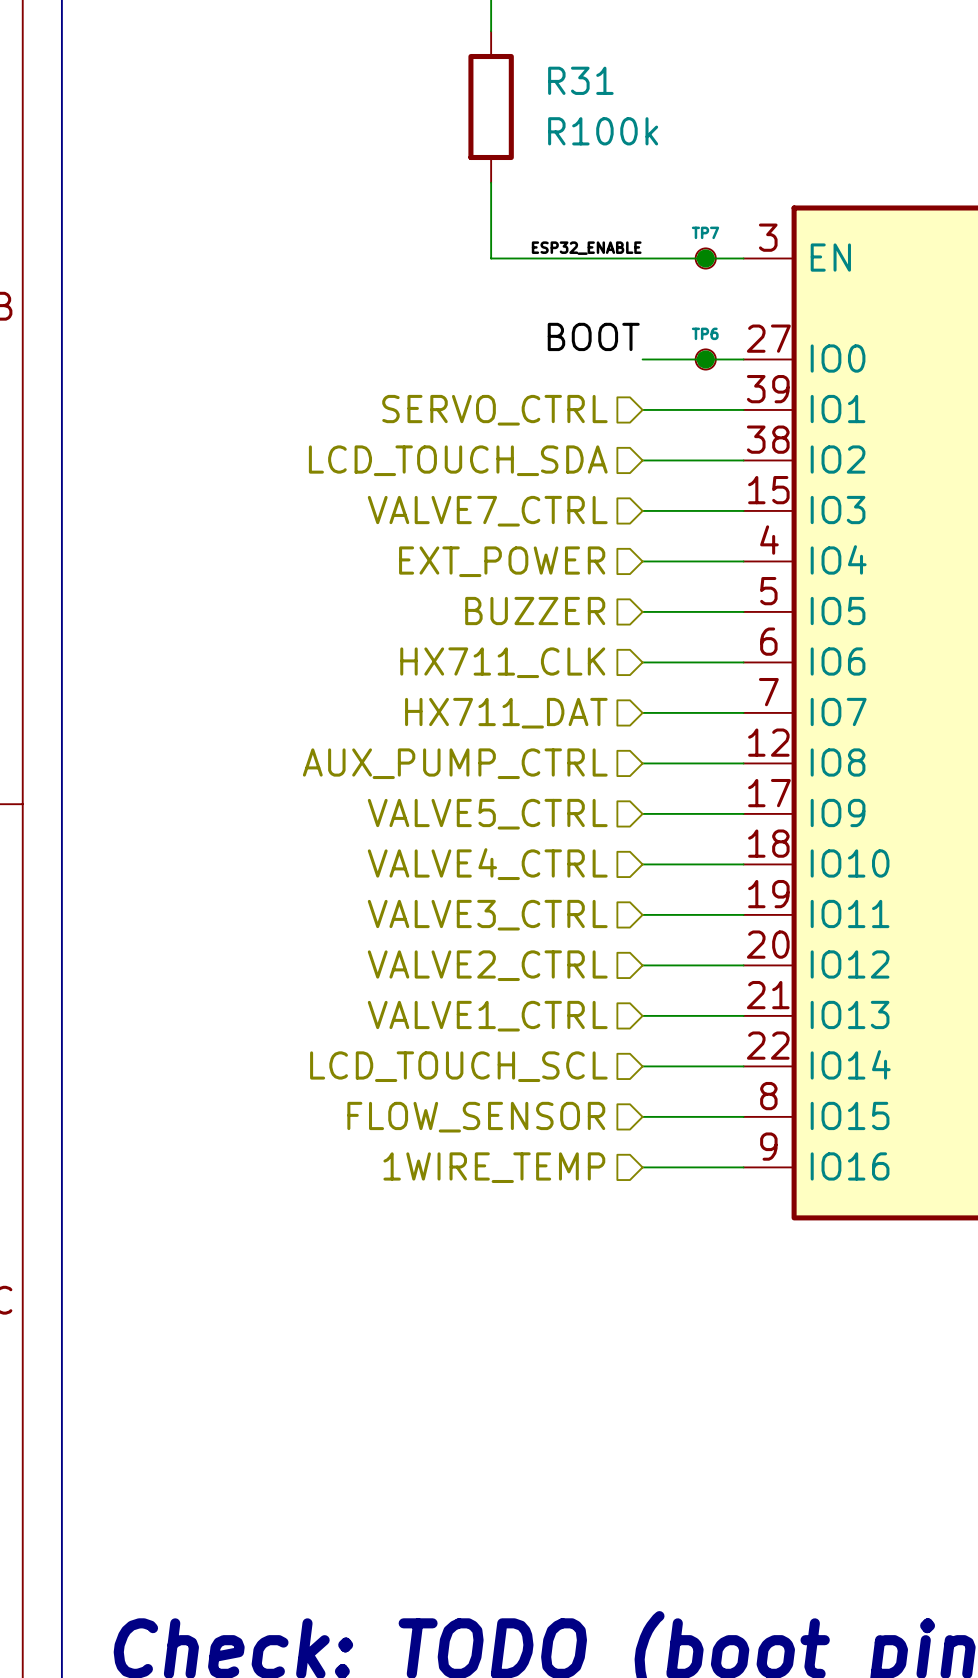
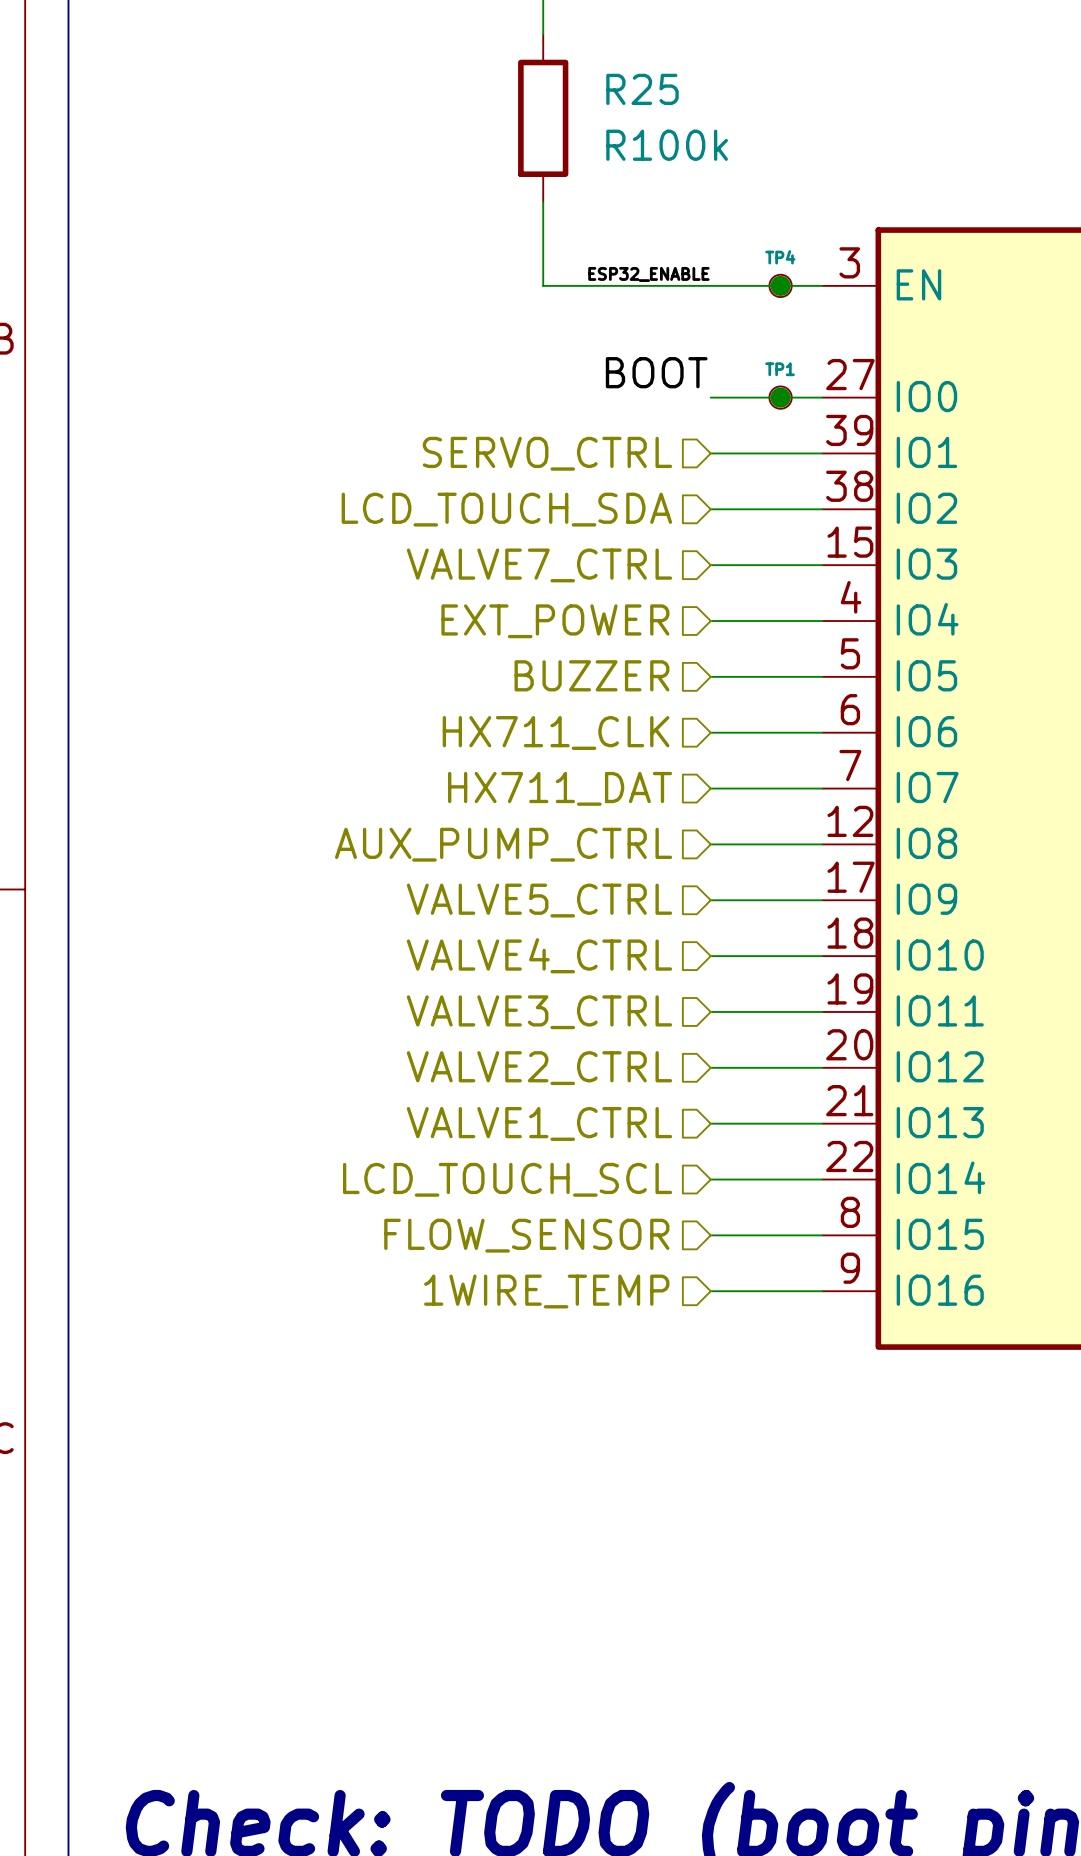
R31 name: R31 (580, 80) -> R25 (642, 89)
TP7 name: TP7 (705, 232) -> TP4 (780, 257)
TP6 name: TP6 (705, 333) -> TP1 (780, 369)

